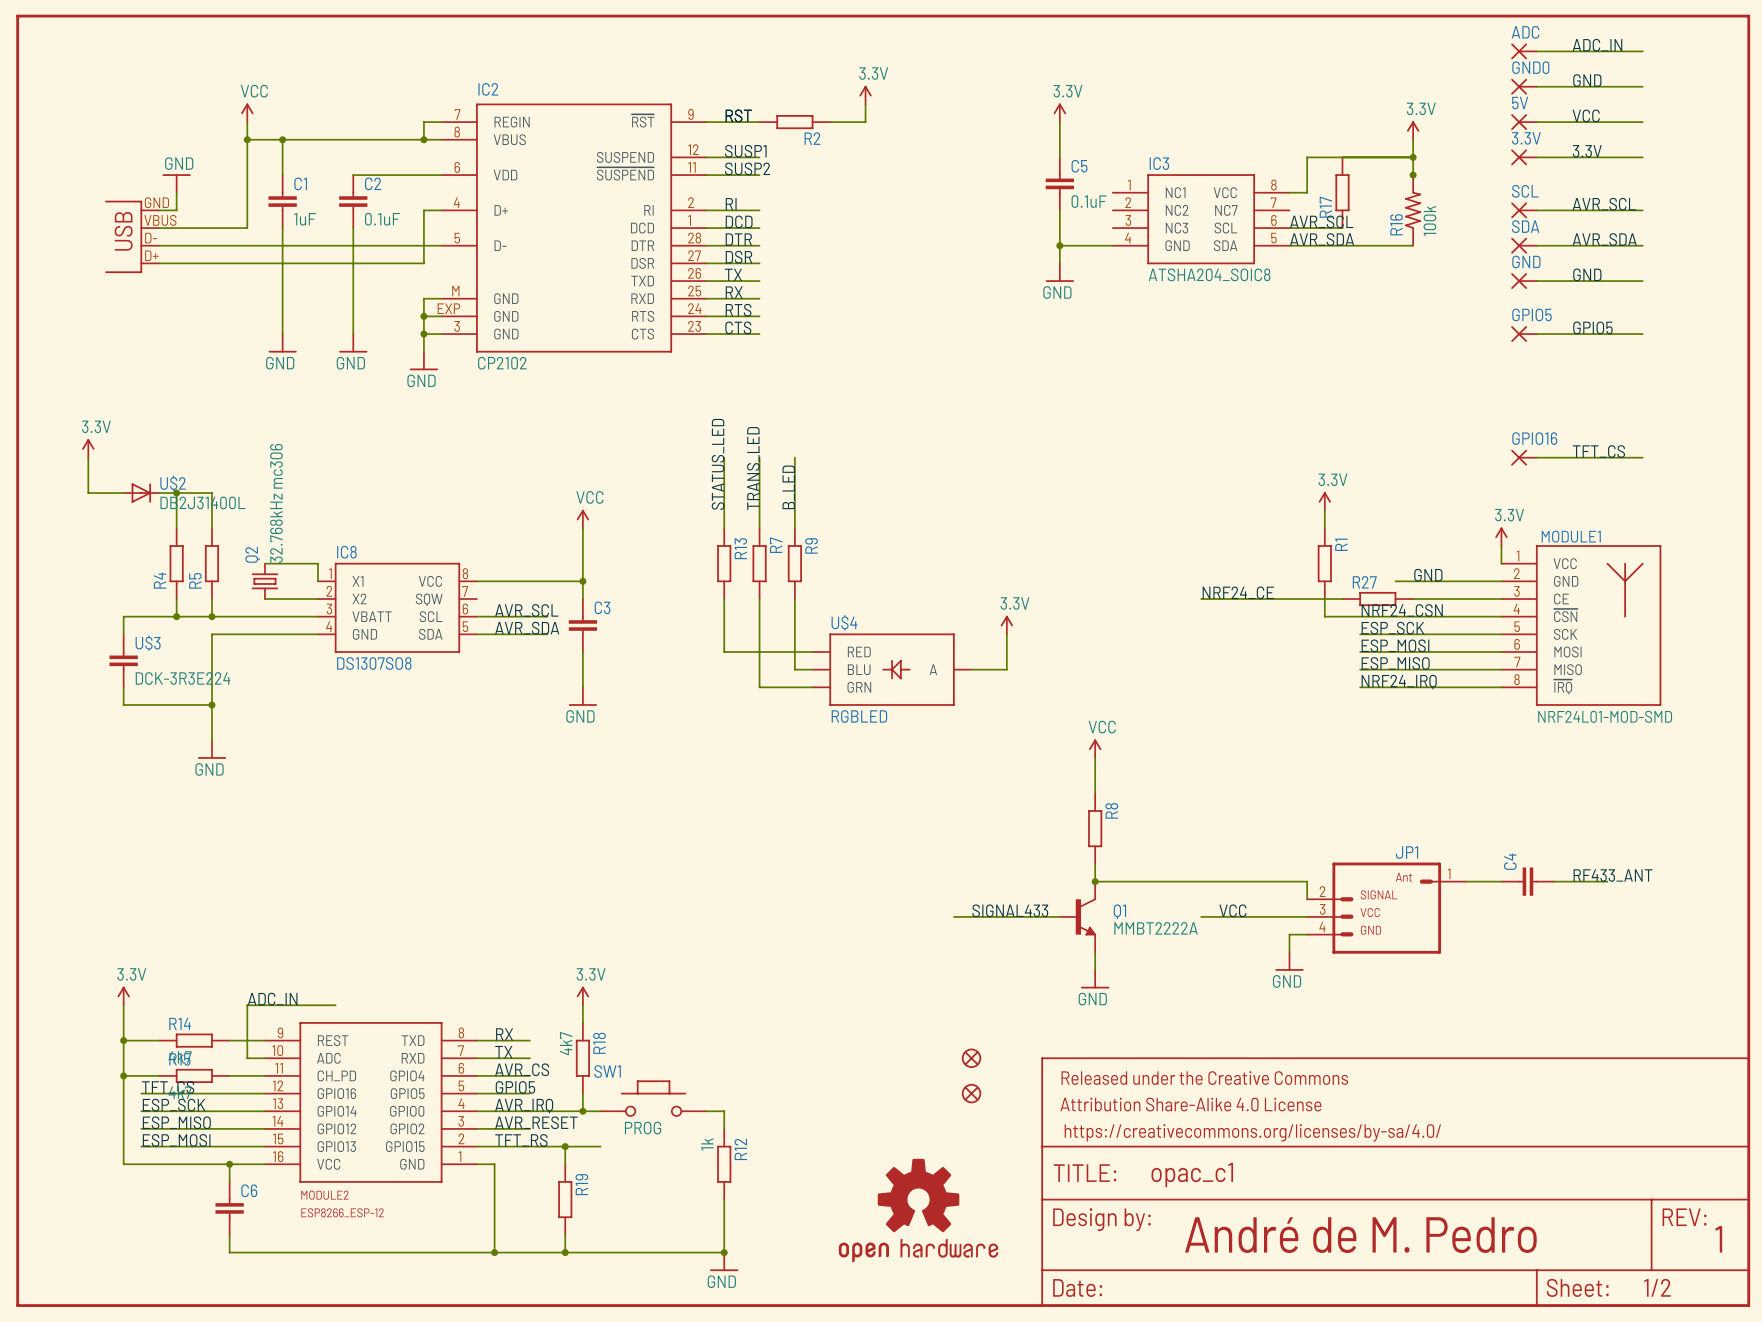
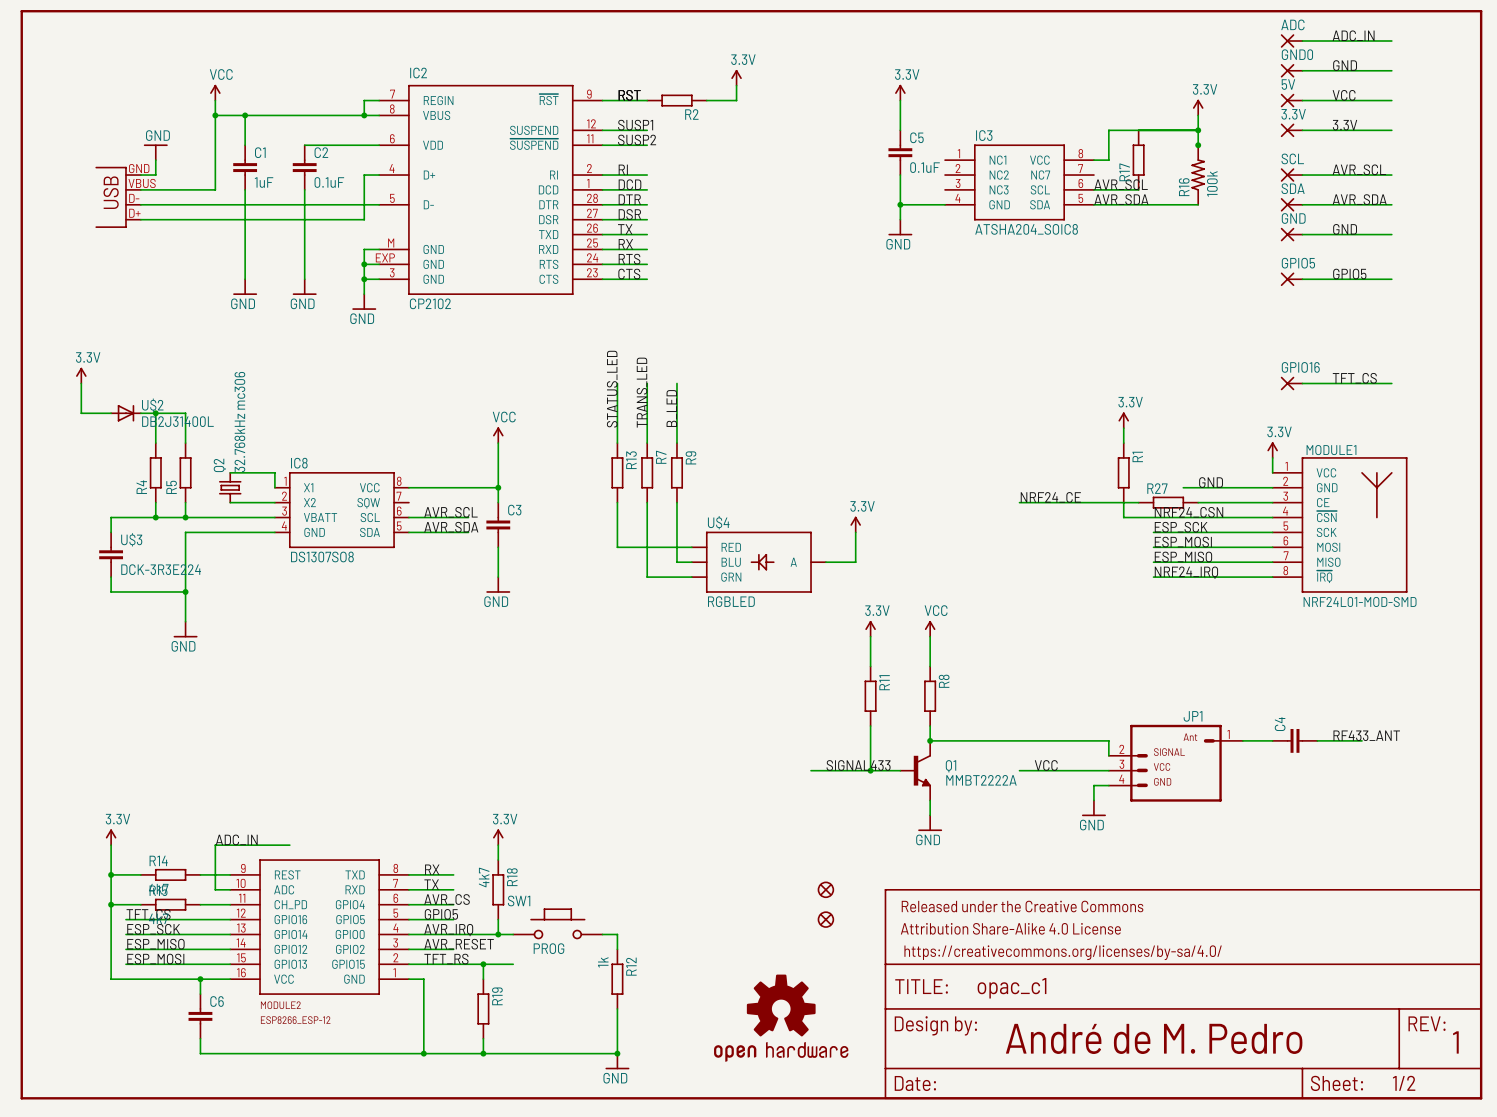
power symbol: none -> 3.3V (870, 628)
wire: none -> (870, 636) (870, 666)
R11: none -> (870, 696)
wire: none -> (870, 726) (870, 770)
junction: none -> (870, 770)

